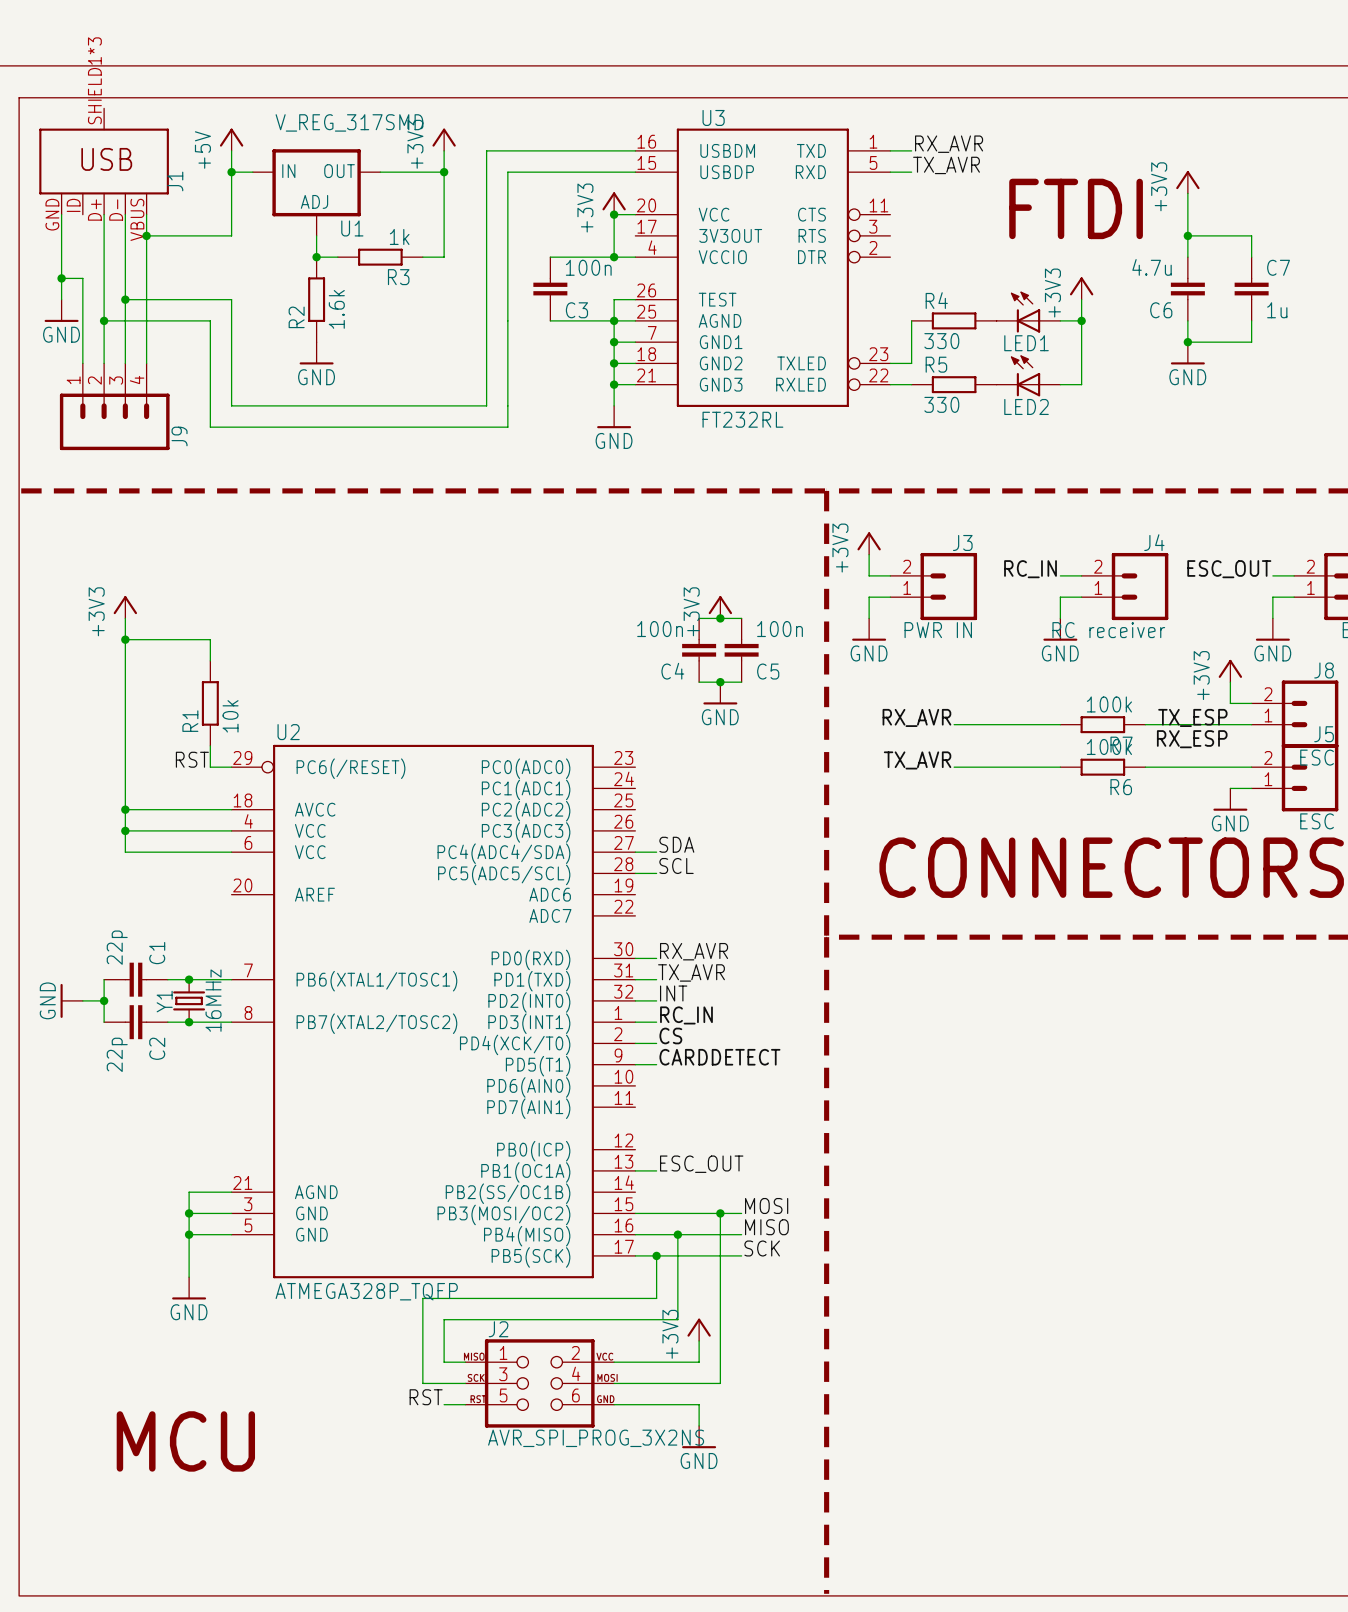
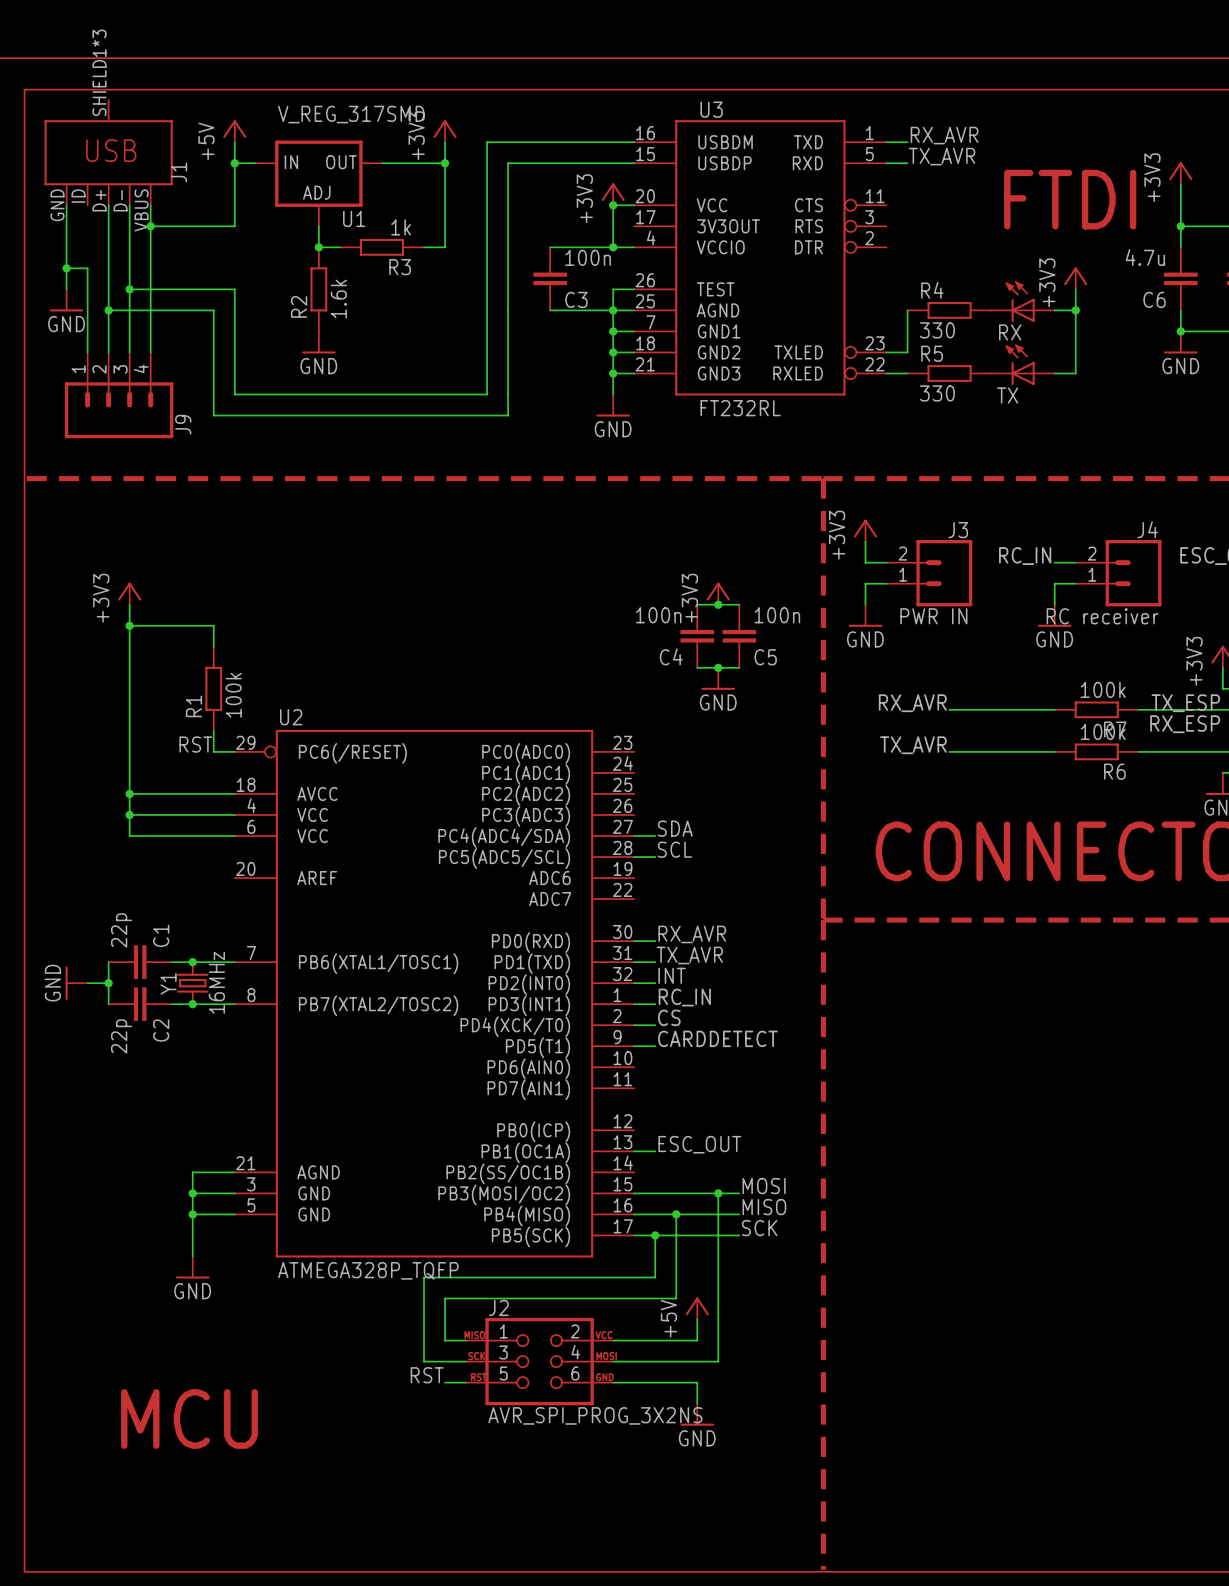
LED1 name: LED1 (1026, 343) -> RX (1010, 332)
LED2 name: LED2 (1026, 406) -> TX (1007, 395)
R1 value: 10k (230, 716) -> 100k (233, 695)
power symbol: +3V3 (699, 1329) -> +5V (697, 1308)

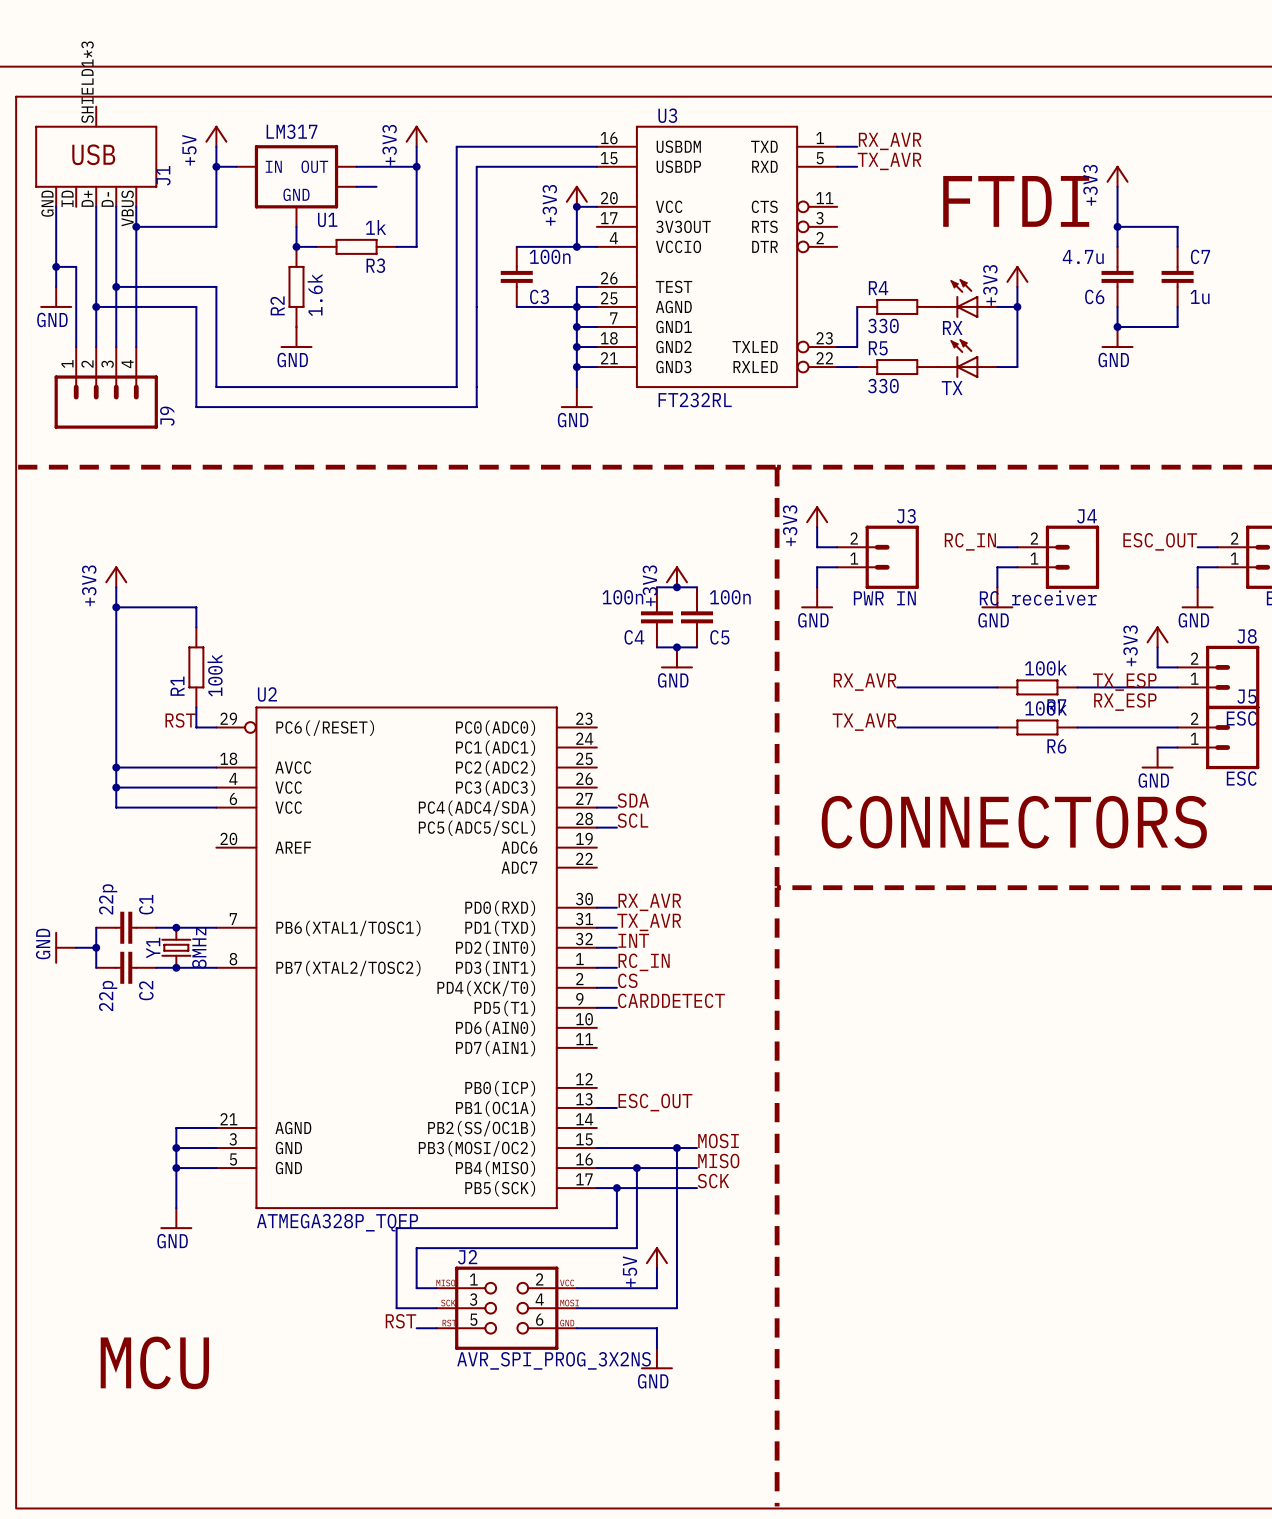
U1 value: V_REG_317SMD (351, 114) -> LM317 (292, 131)
U1 symbol: [255, 140, 382, 227] -> [236, 145, 357, 227]
wire: none -> (356, 186) (376, 186)
Y1 value: 16MHz (216, 982) -> 8MHz (199, 948)

